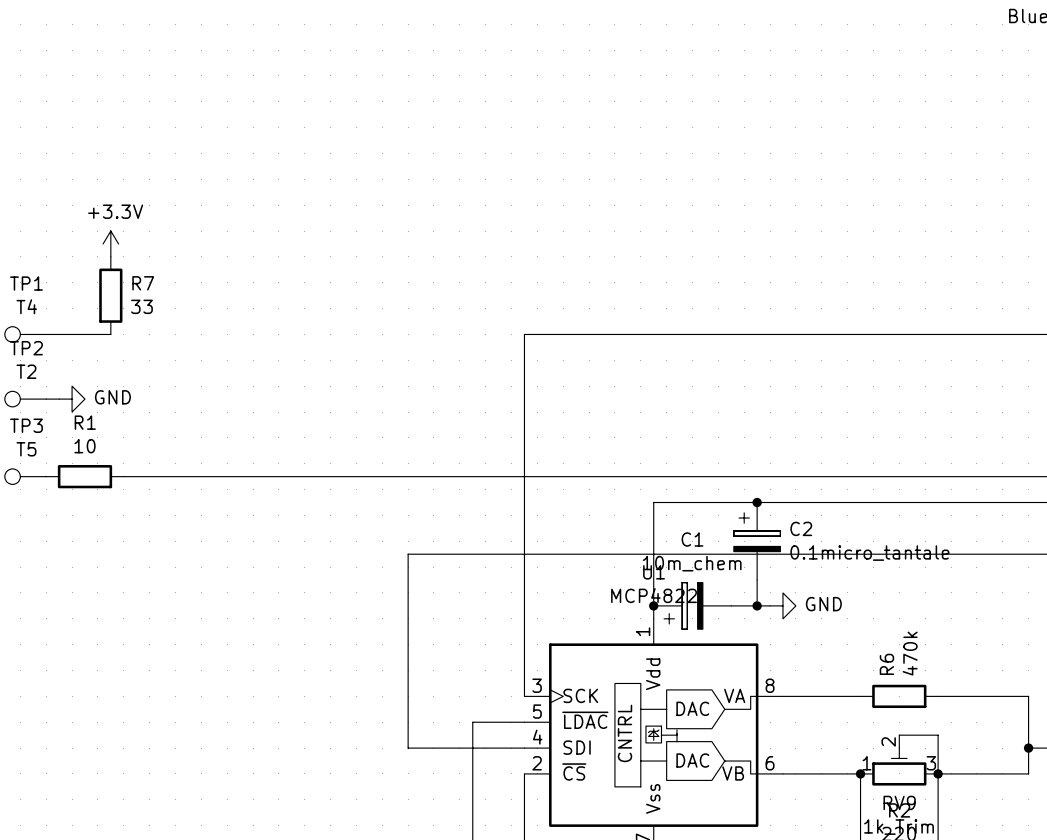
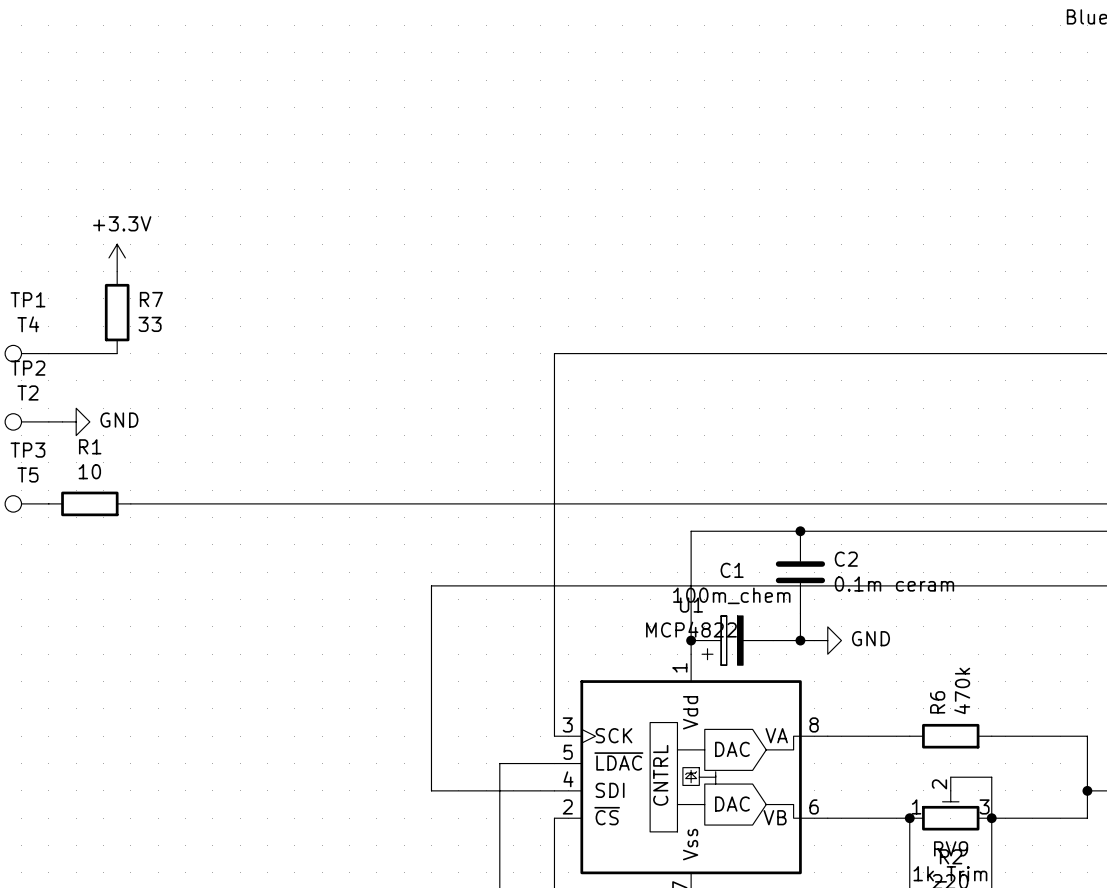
C2 symbol: [733, 502, 781, 581] -> [775, 531, 826, 614]
C2 value: 0.1micro_tantale (869, 553) -> 0.1m ceram (894, 584)
C1 value: 10m_chem (692, 563) -> 100m_chem (731, 595)

